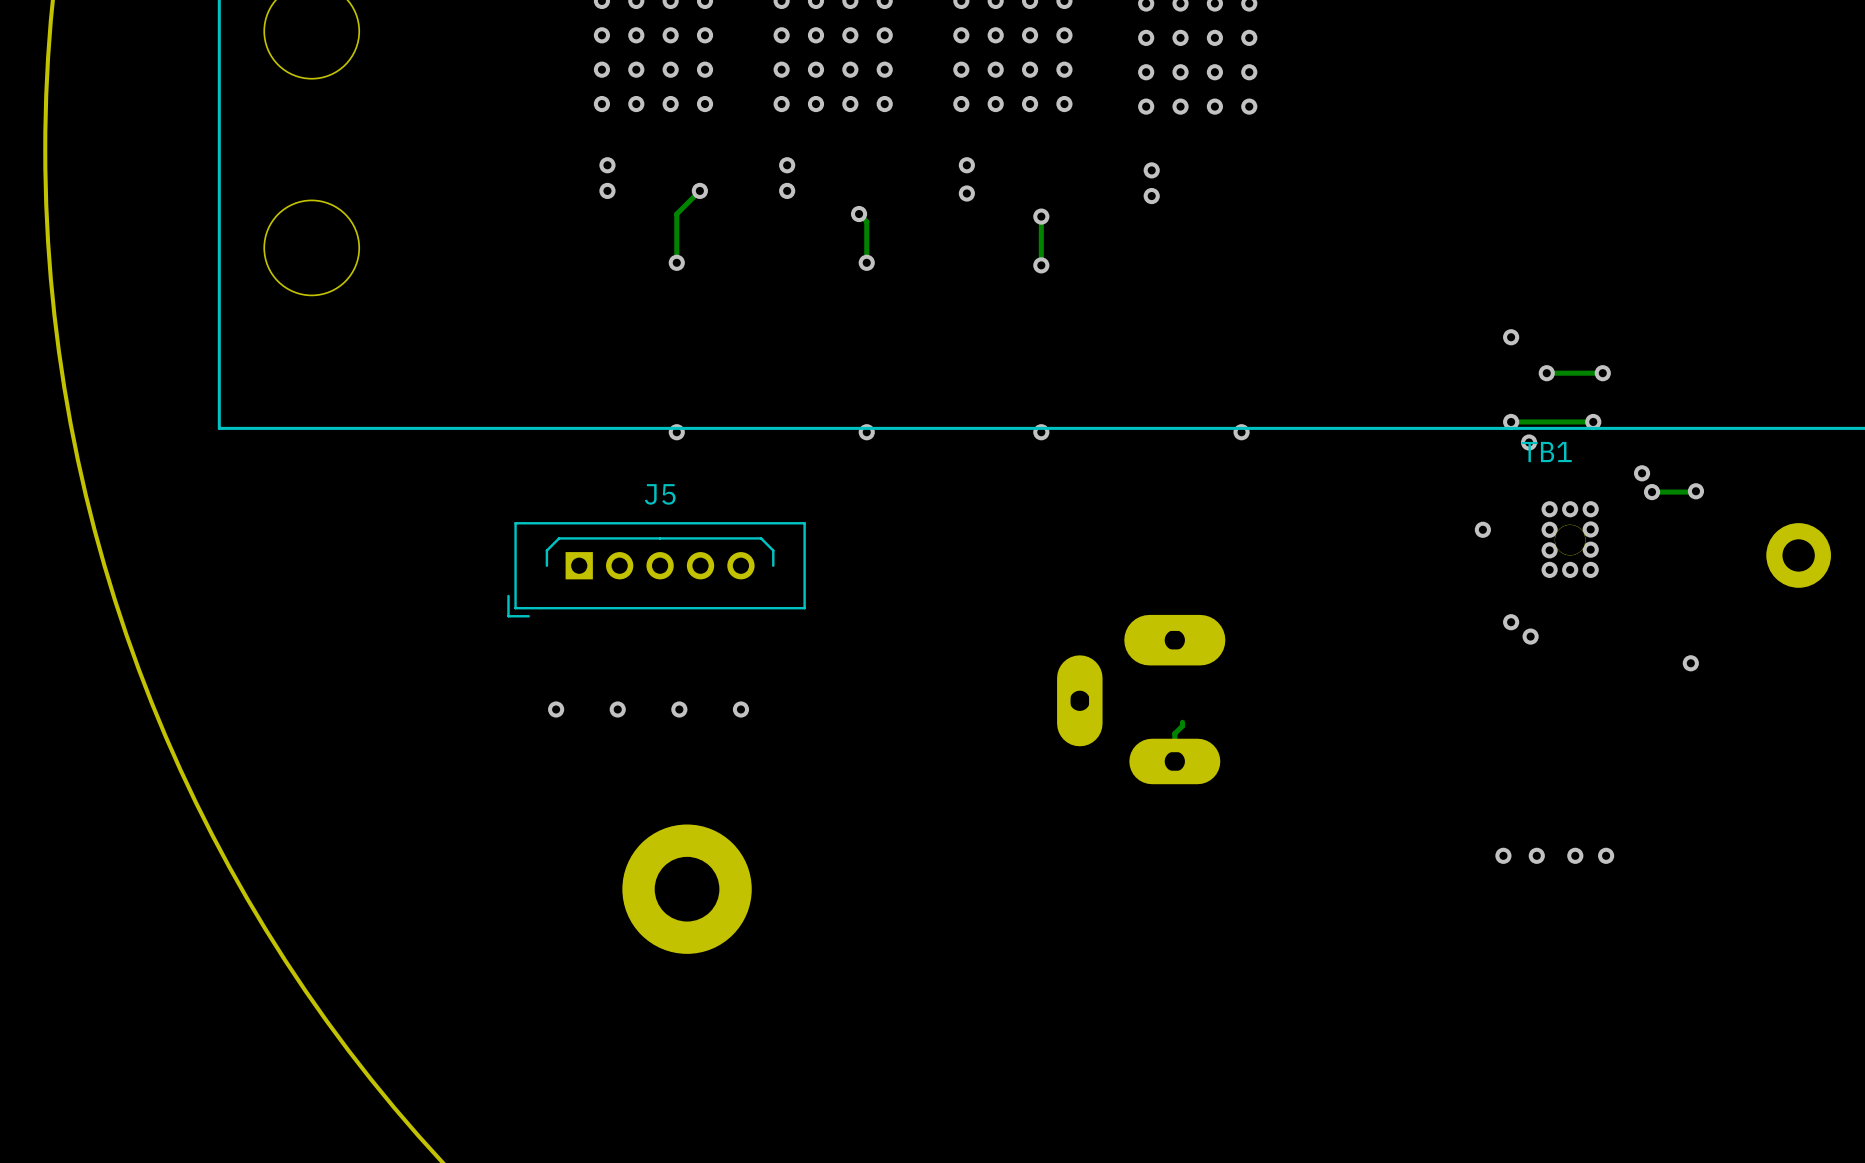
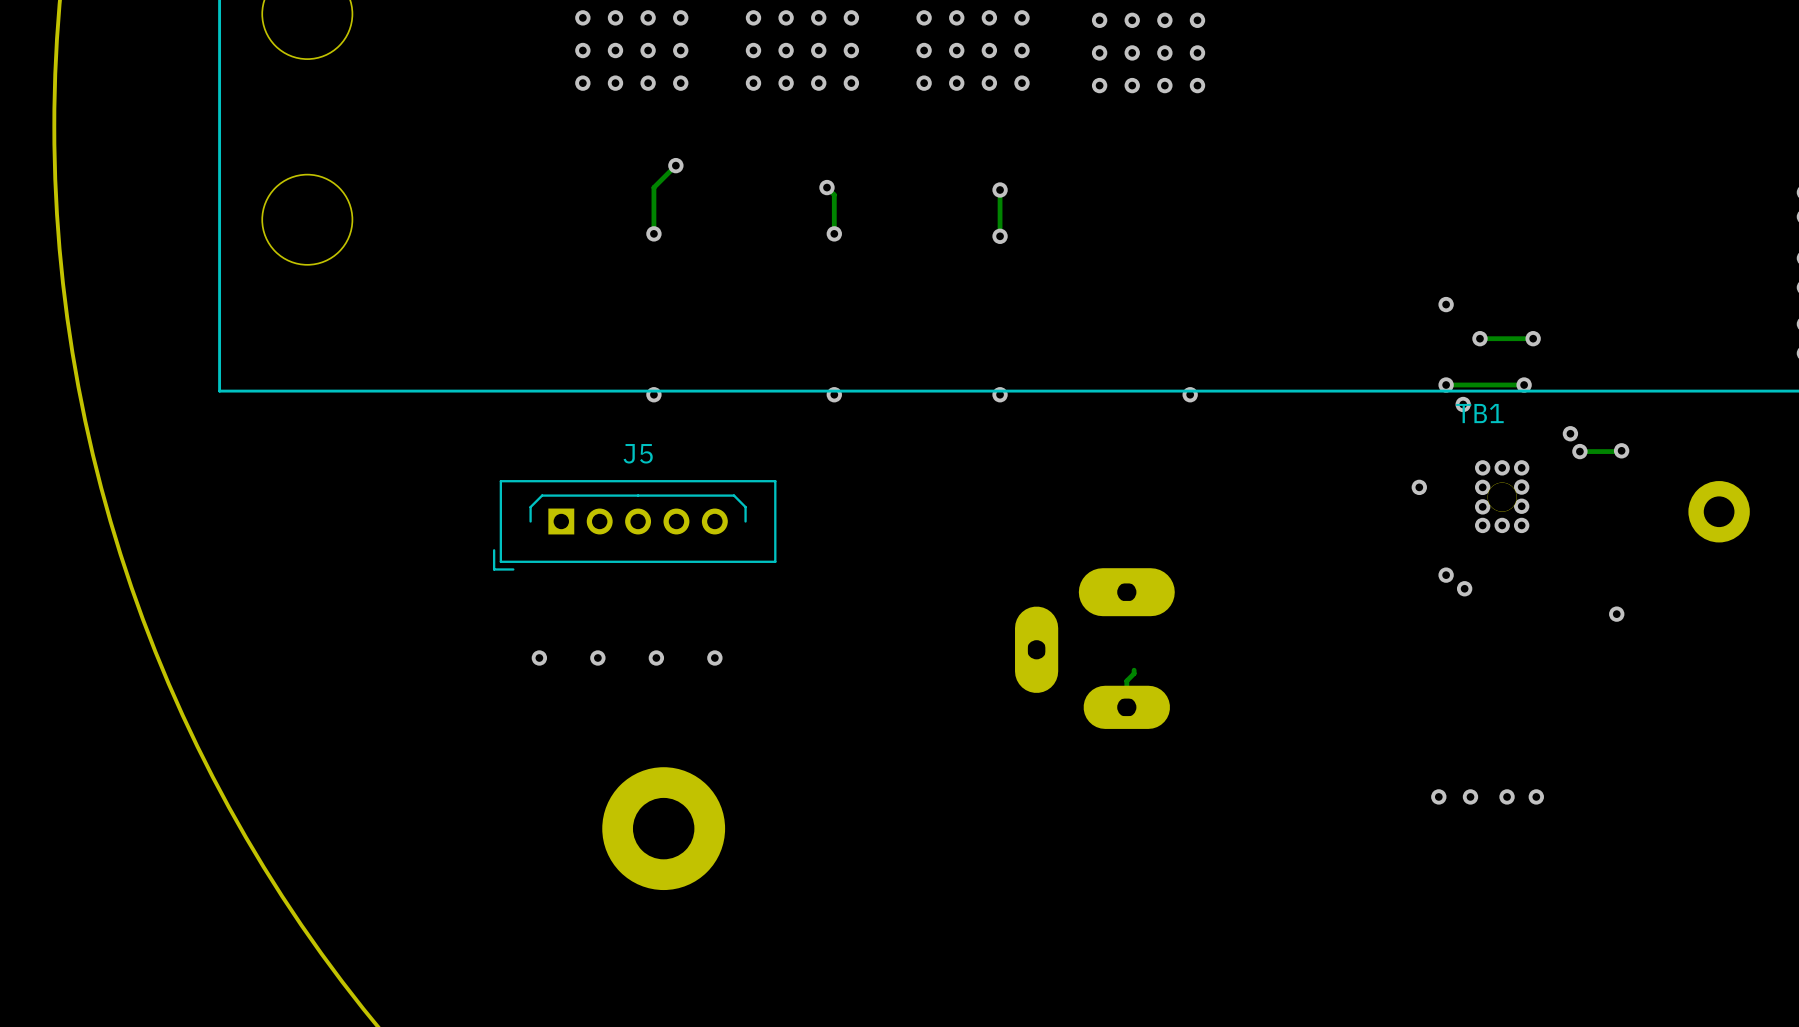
via: (607, 165) -> none
via: (787, 165) -> none
via: (966, 165) -> none
via: (1151, 170) -> none
via: (607, 190) -> none
via: (787, 190) -> none
via: (966, 193) -> none
via: (1151, 196) -> none

